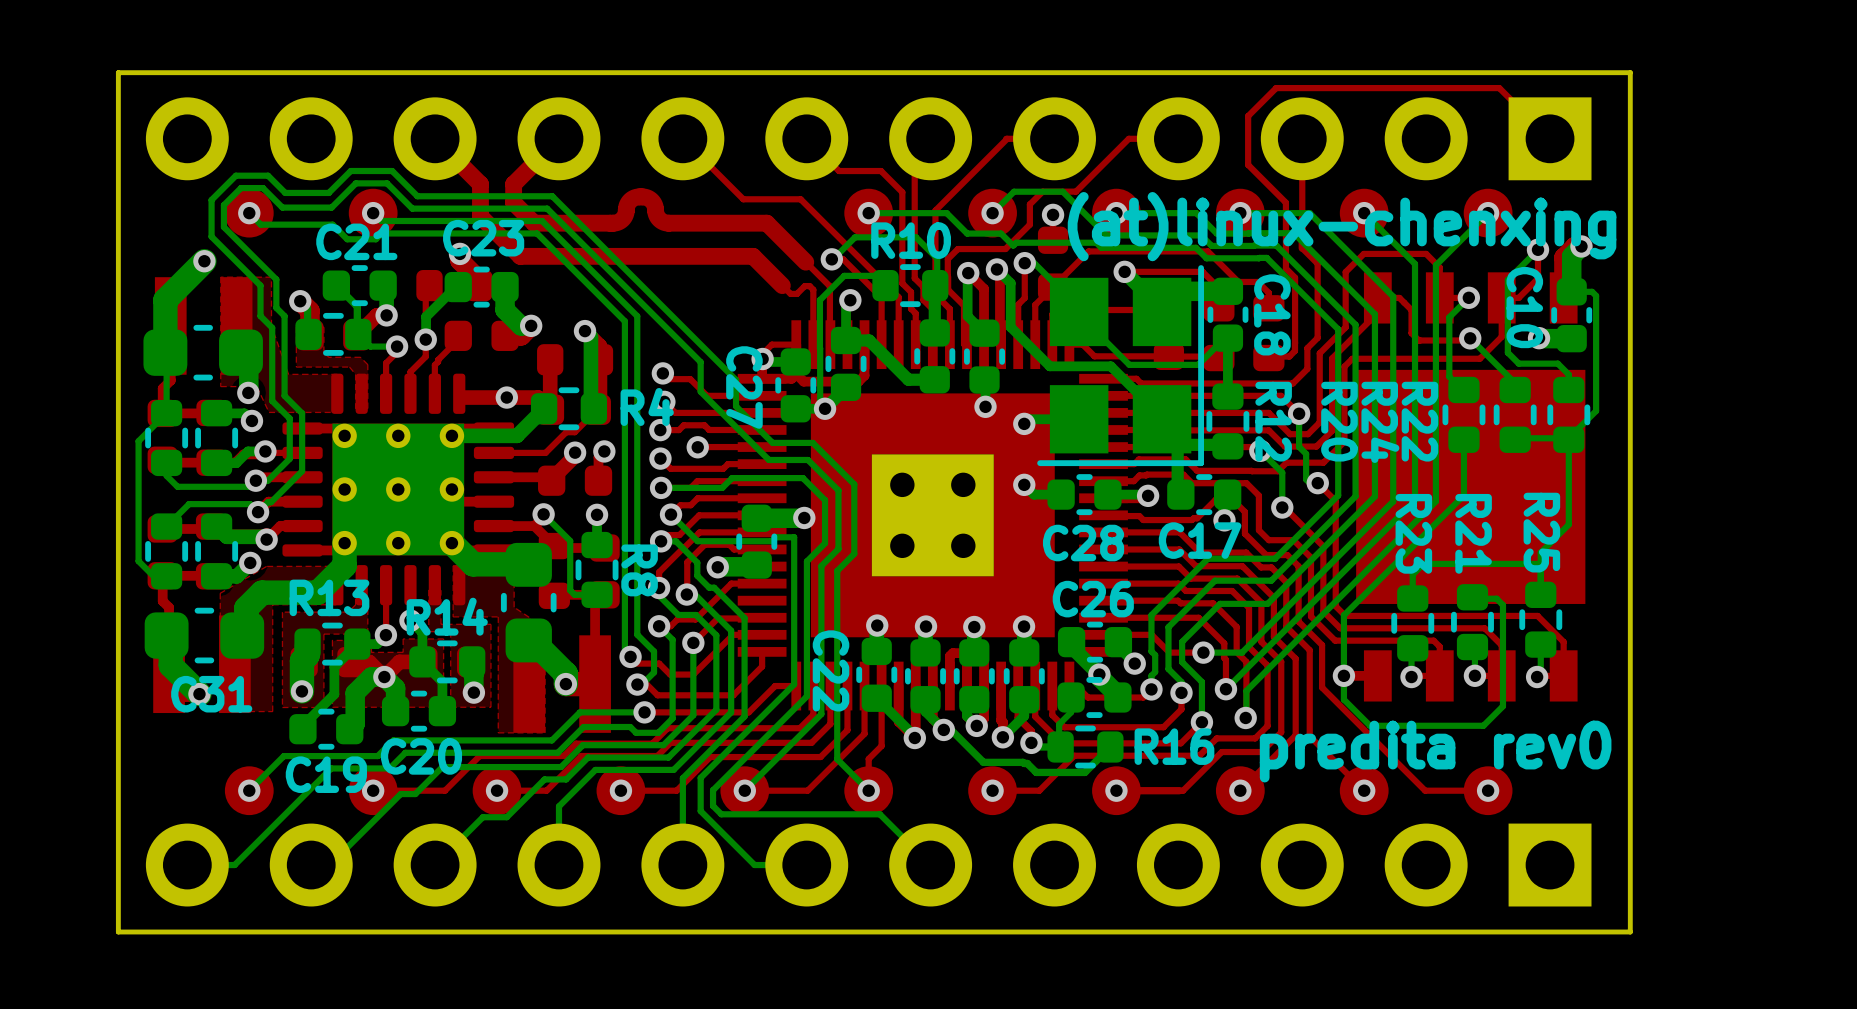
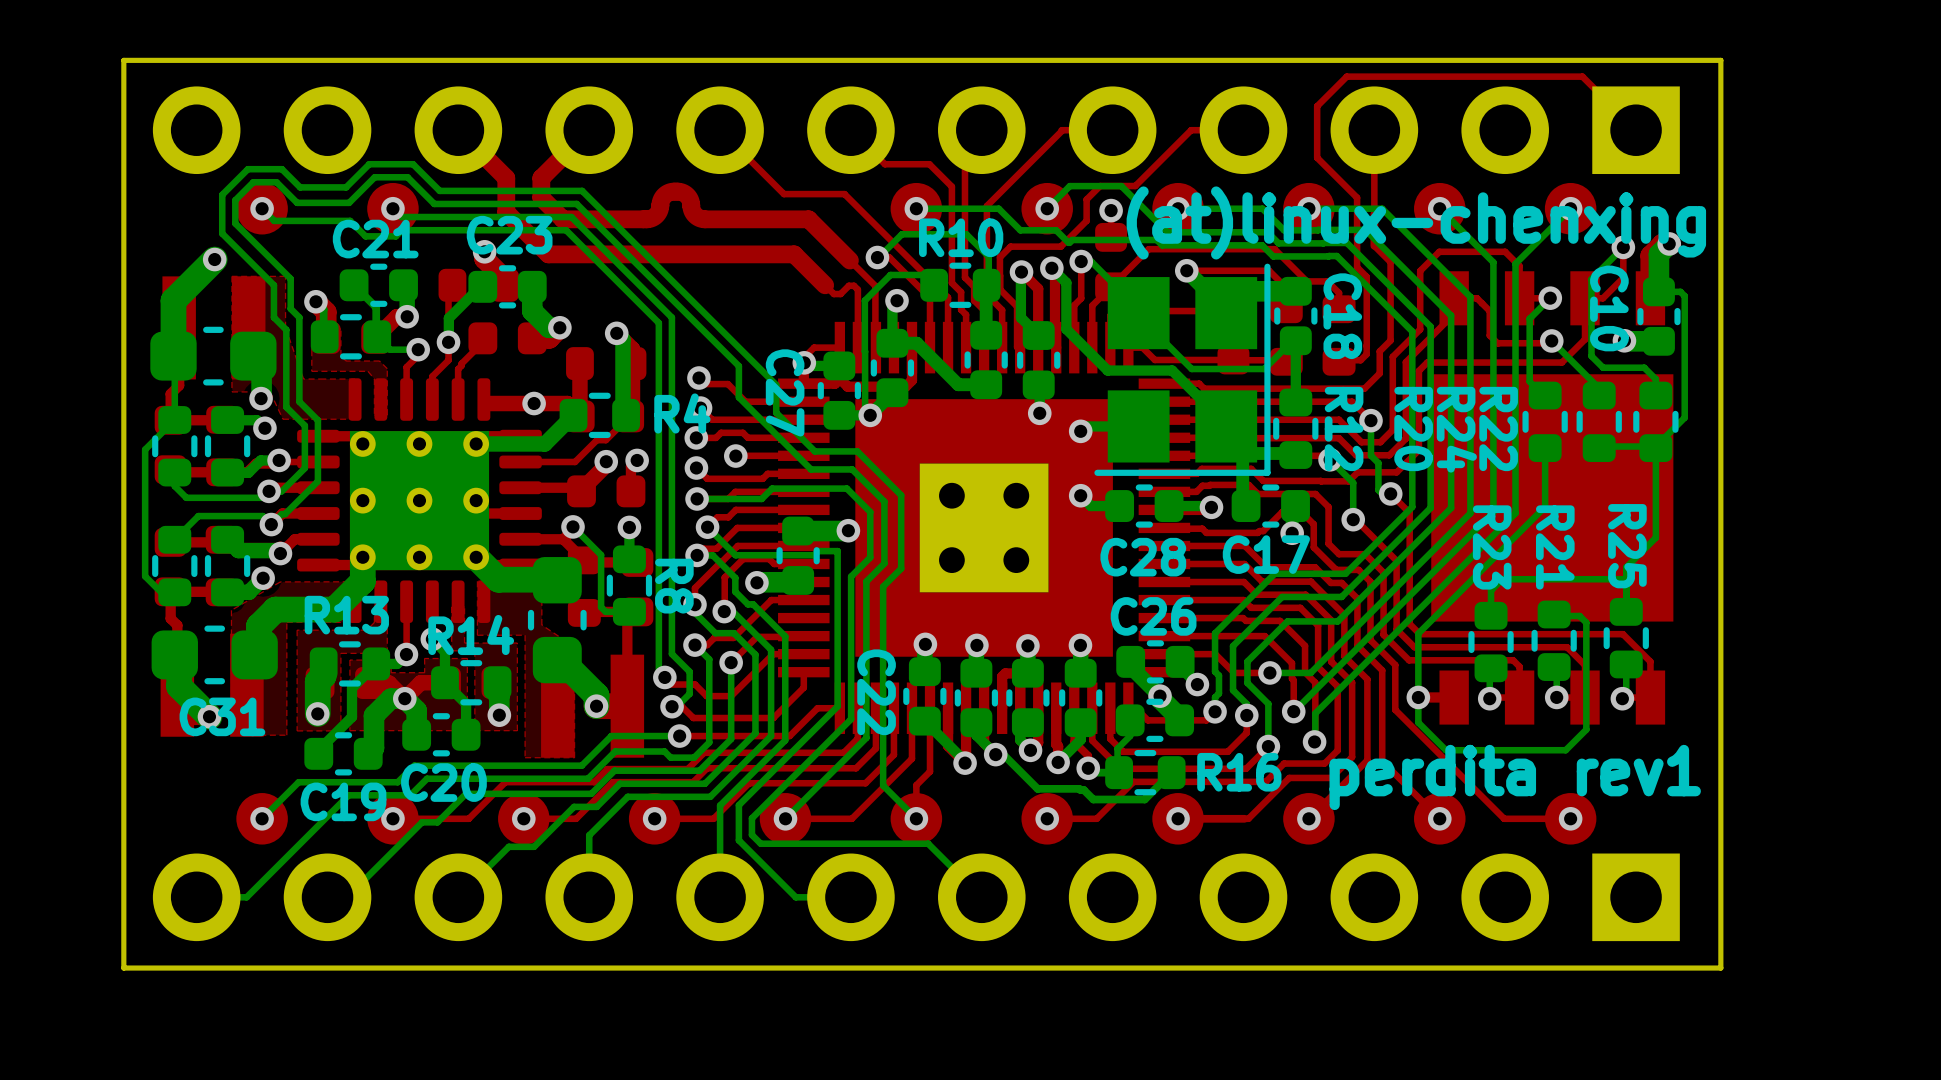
text: predita rev0 (1435, 751) -> perdita rev1 (1515, 777)

